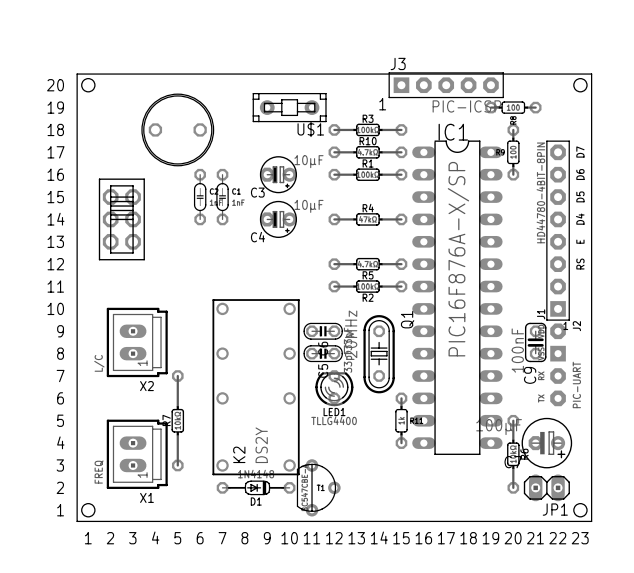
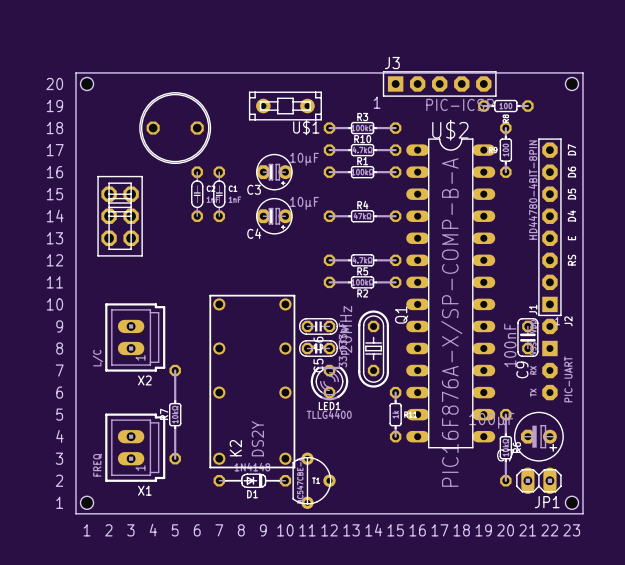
IC1 name: IC1 (453, 132) -> U$2 (450, 130)
IC1 value: PIC16F876A-X/SP (458, 259) -> PIC16F876A-X/SP-COMP-B-A (451, 322)

